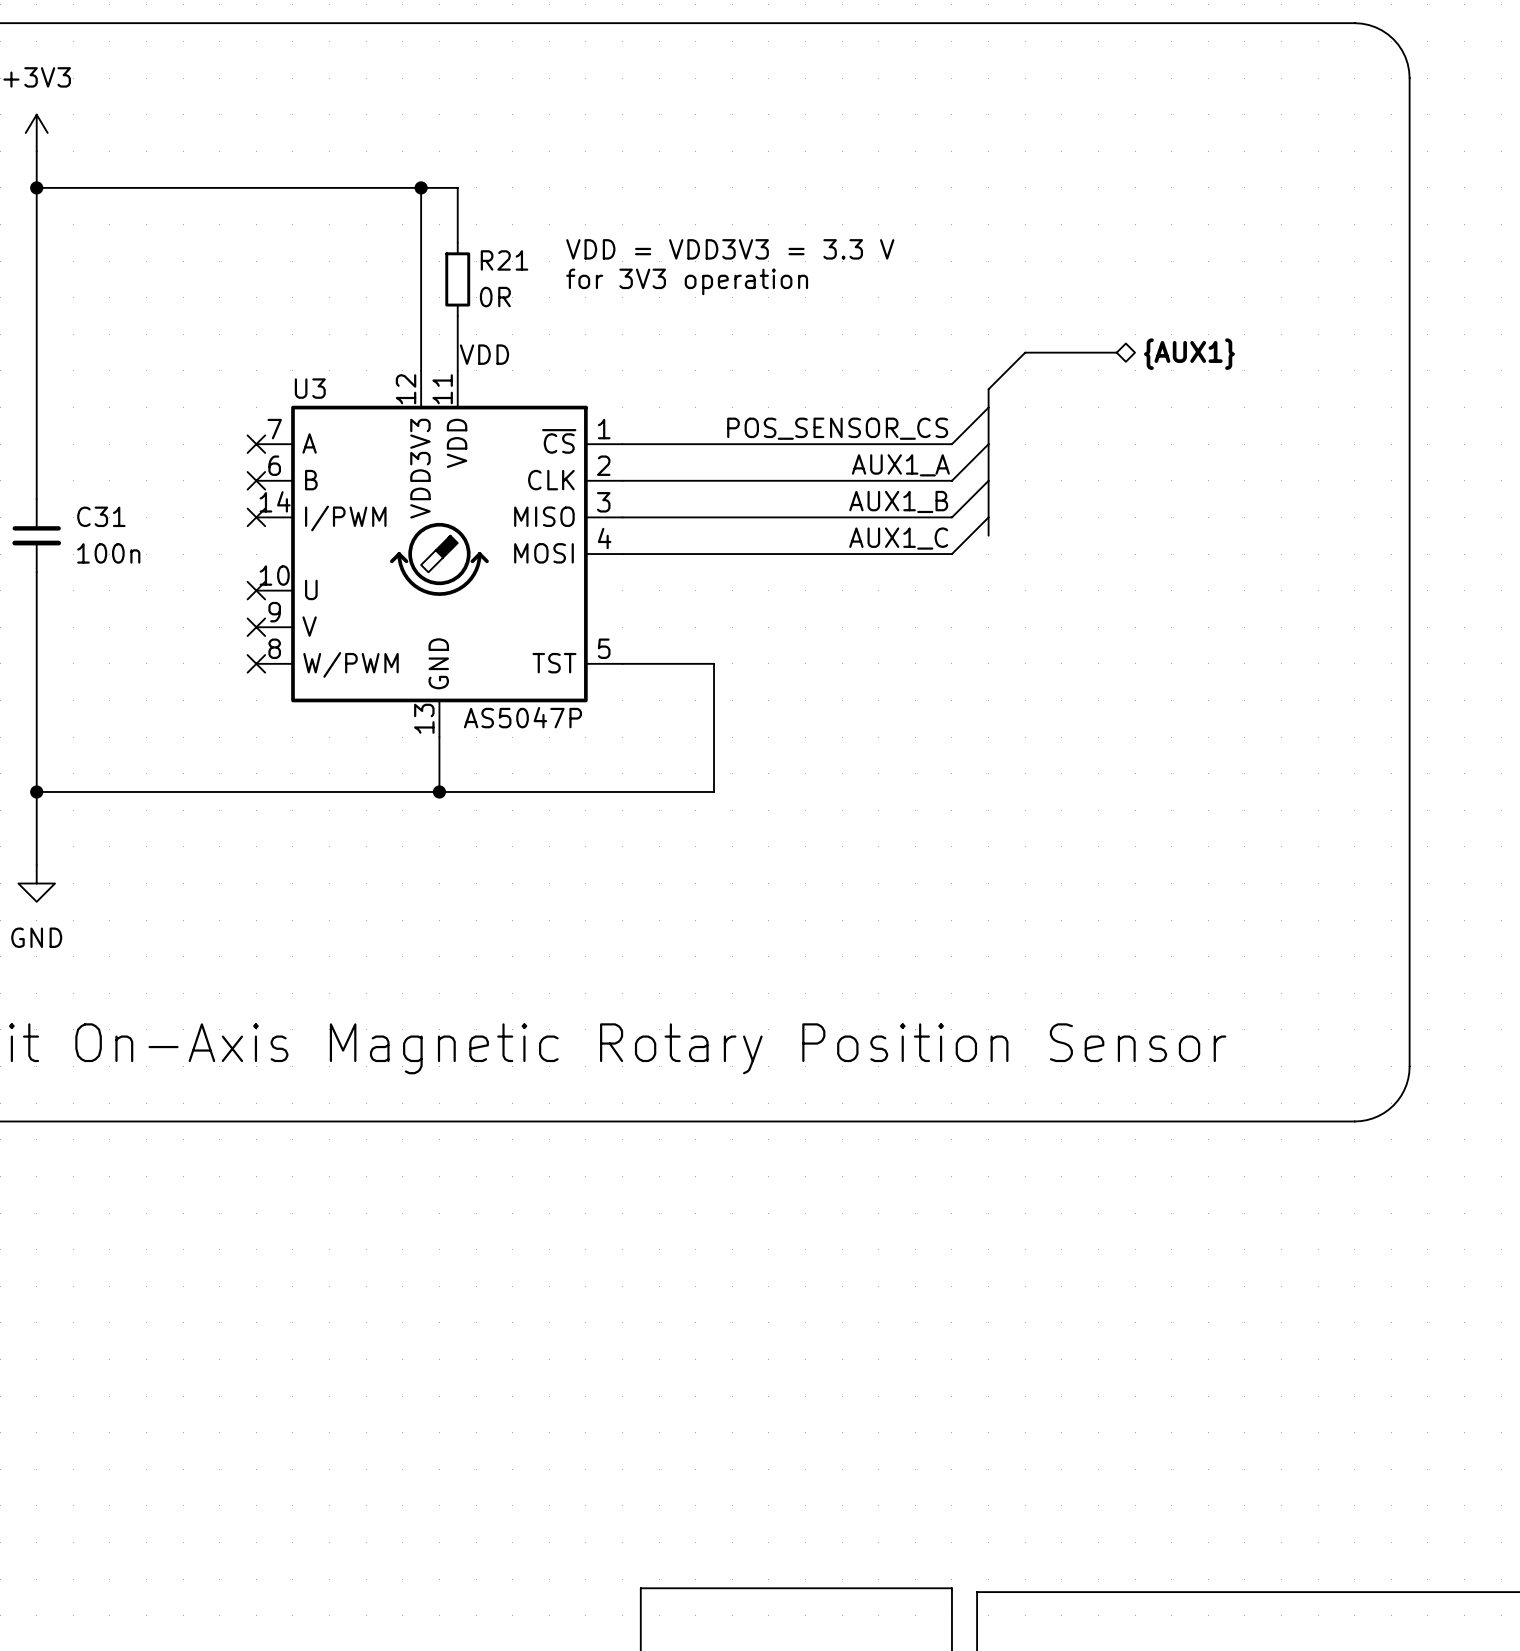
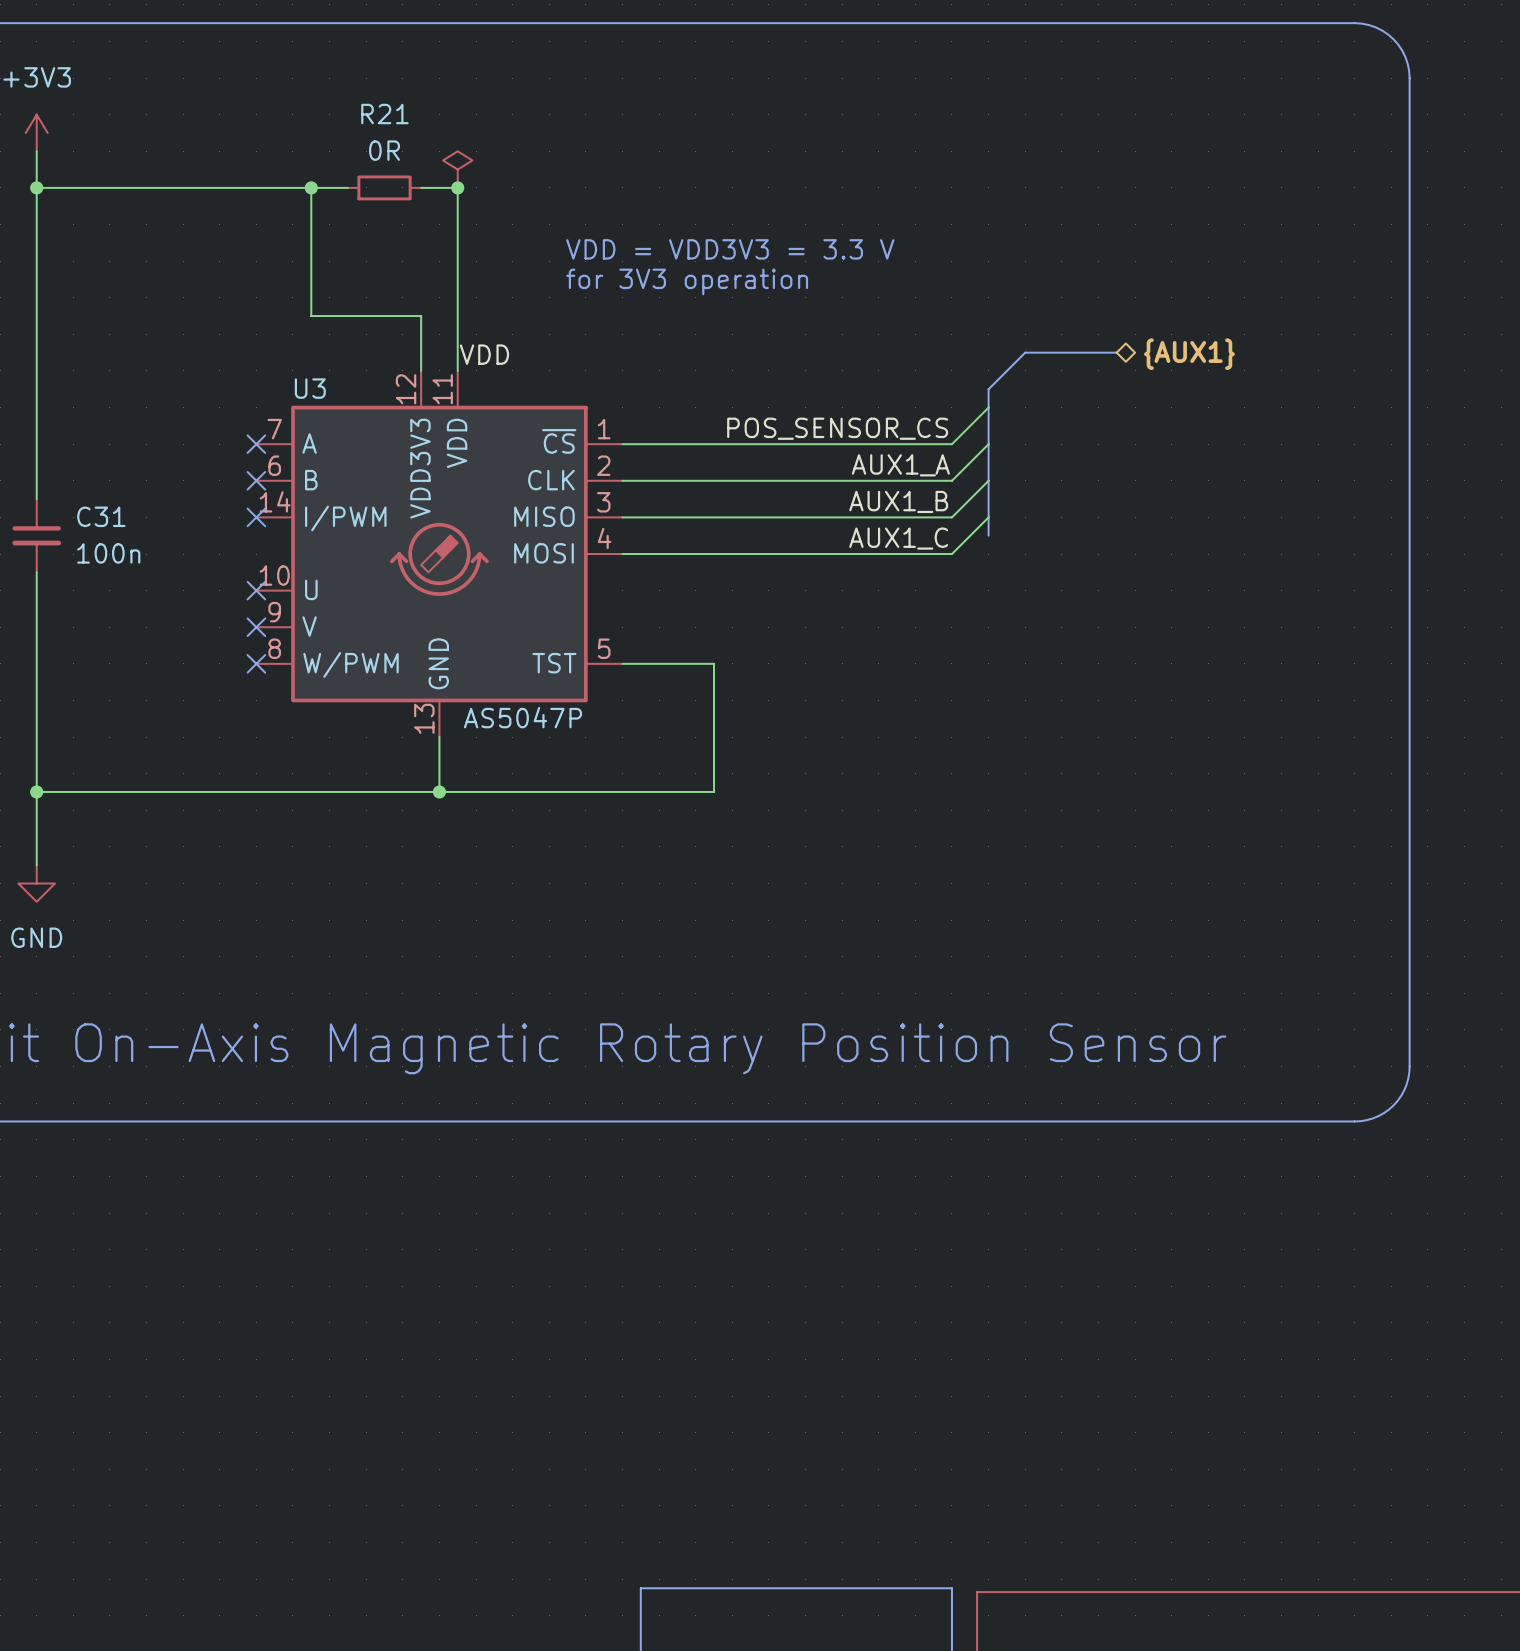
power symbol: none -> (457, 169)
junction: none -> (311, 187)
wire: (347, 187) (421, 187) (421, 316) -> (311, 187) (311, 316) (421, 316)
junction position: (421, 187) -> (457, 187)
wire: none -> (457, 242) (457, 316)
R21 name position: R21 (504, 260) -> R21 (384, 114)
R21 rotation: 0° (457, 279) -> 90° clockwise (384, 187)
R21 position: (457, 279) -> (384, 187)
R21 value position: 0R (495, 297) -> 0R (384, 150)

